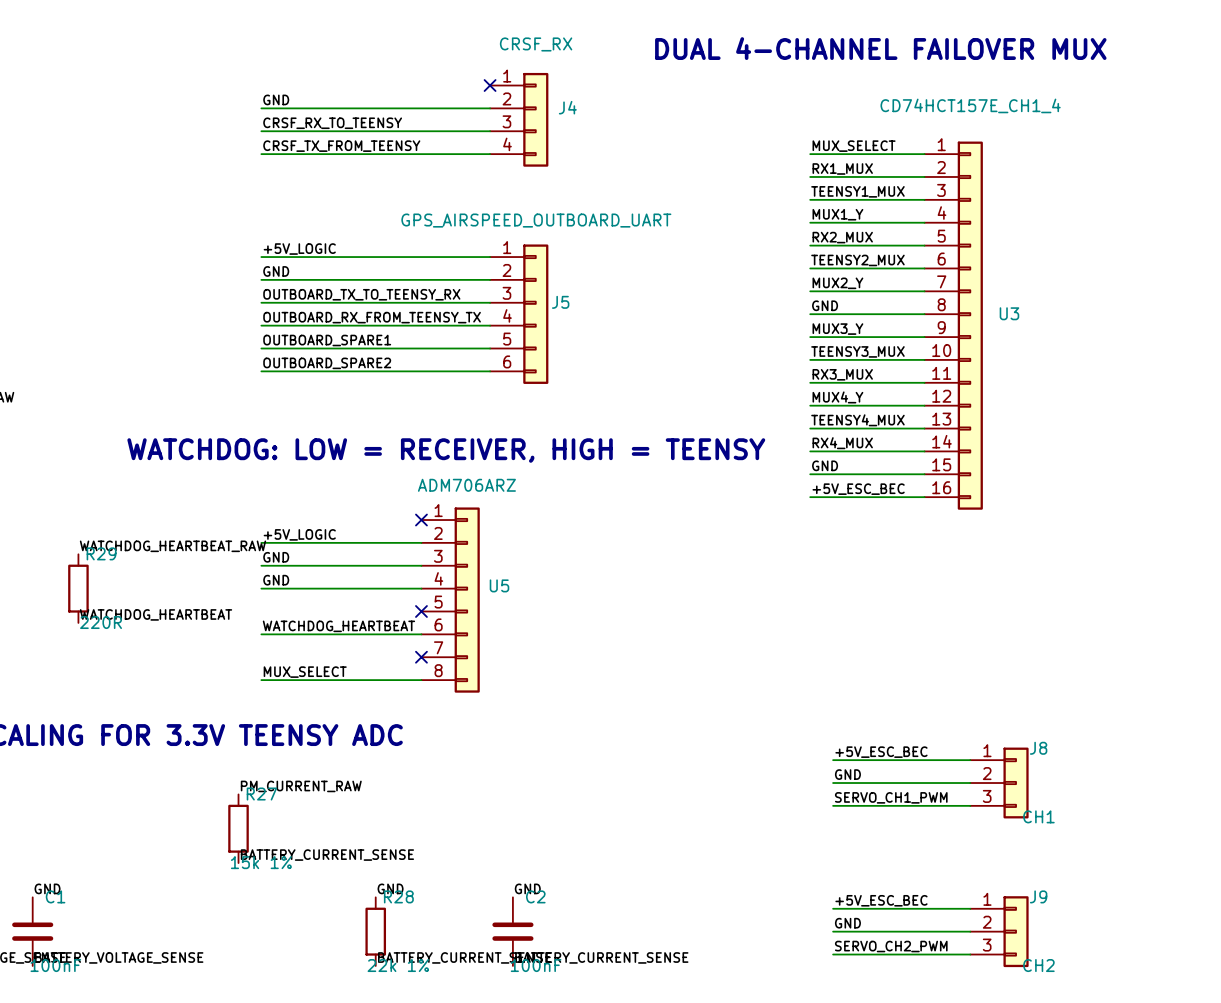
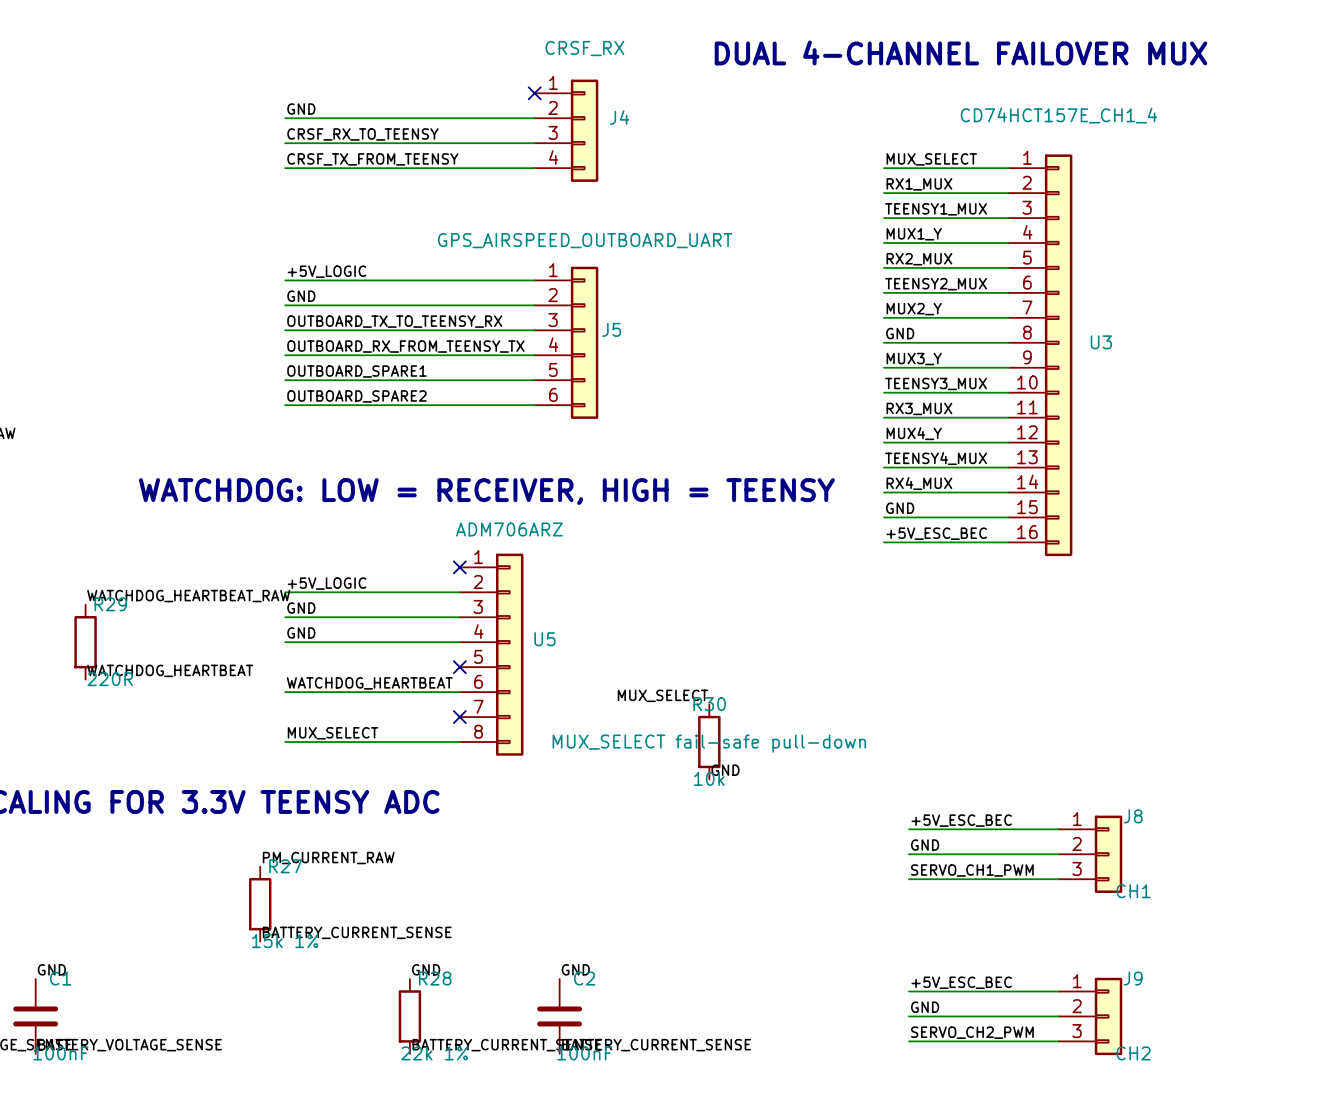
label: none -> MUX_SELECT (662, 695)
R30: none -> 10k (709, 742)
label: none -> GND (725, 770)

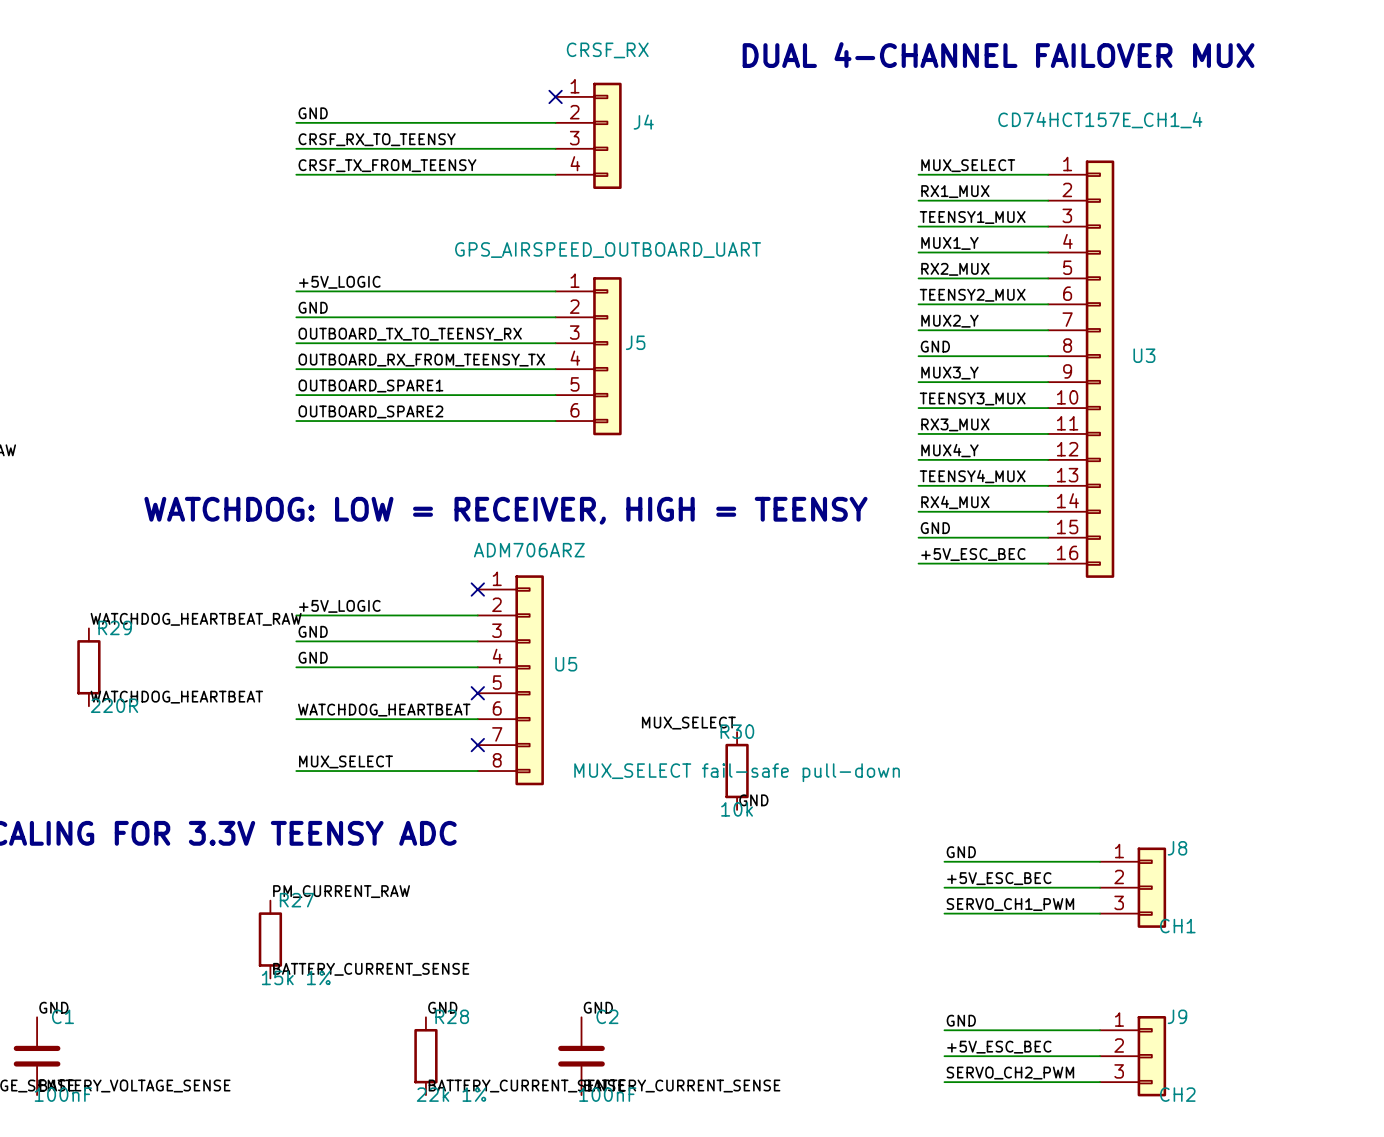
label: +5V_ESC_BEC (961, 820) -> GND (961, 852)
label: GND (925, 845) -> +5V_ESC_BEC (999, 878)
label: +5V_ESC_BEC (961, 982) -> GND (961, 1020)
label: GND (925, 1007) -> +5V_ESC_BEC (999, 1047)

